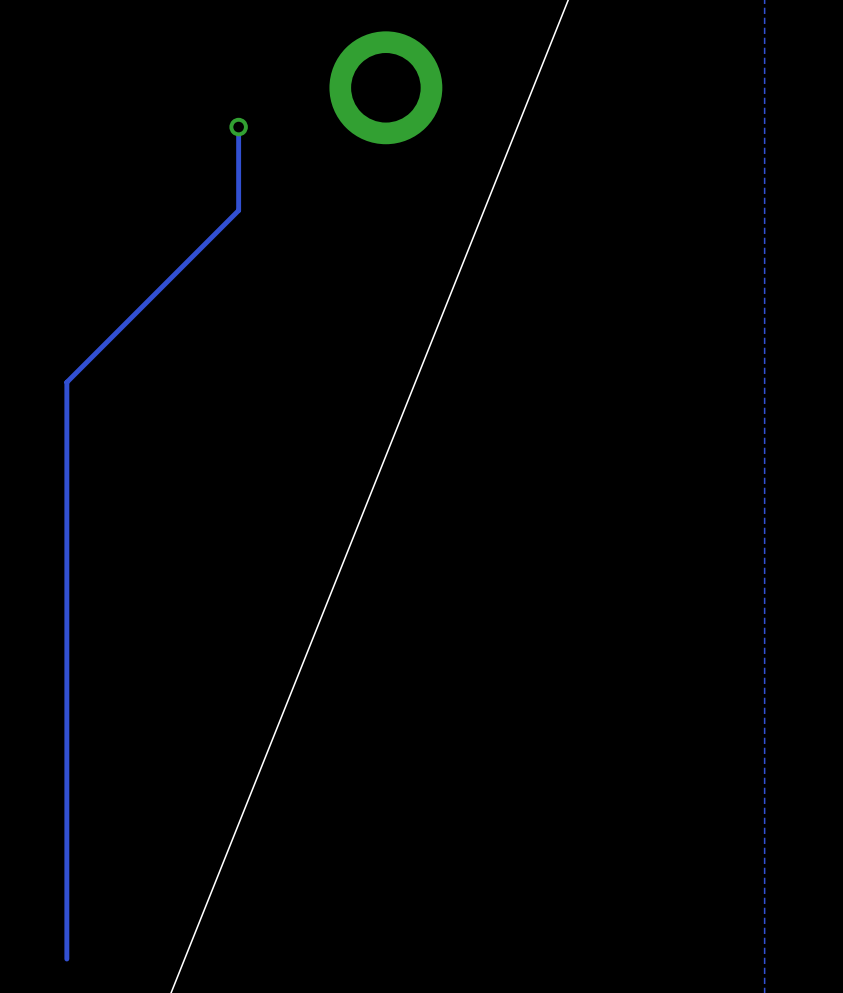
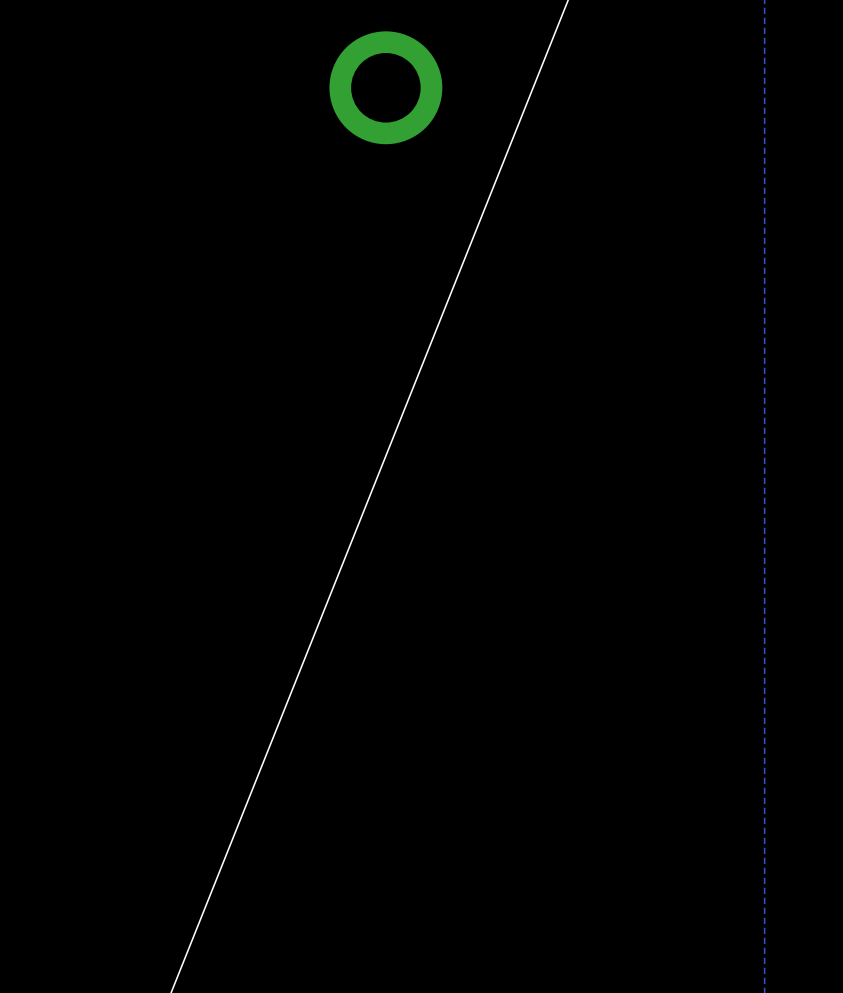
track: (238, 127) (238, 210) (66, 382) (66, 959) -> none
via: (238, 127) -> none

